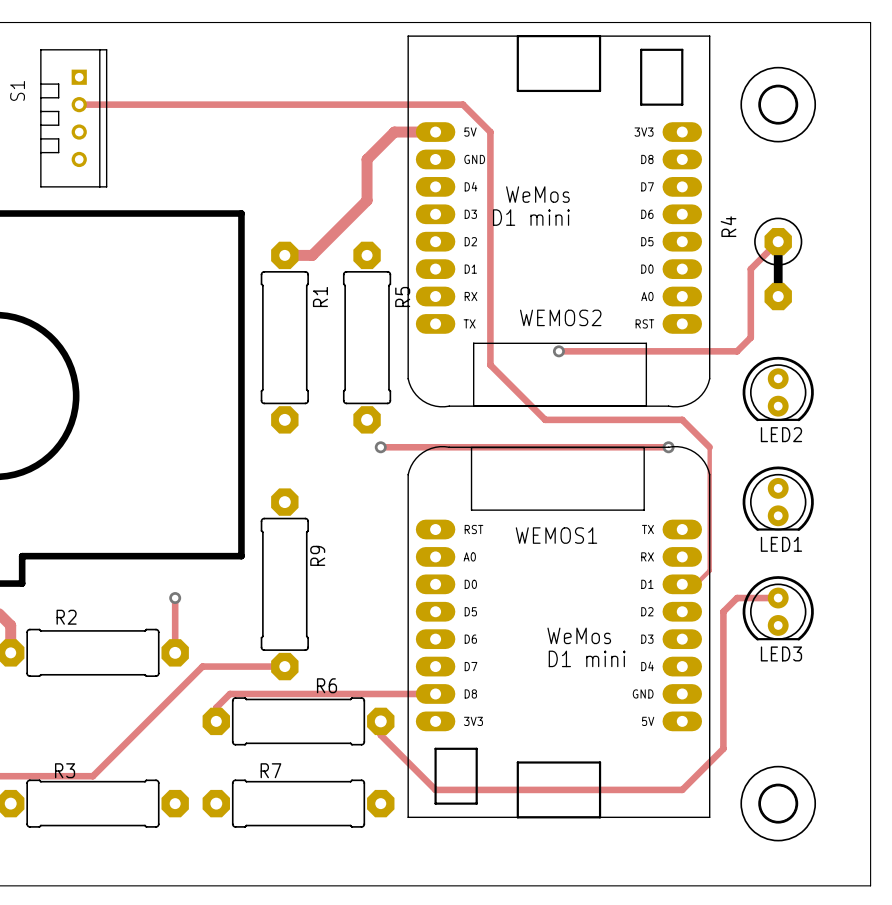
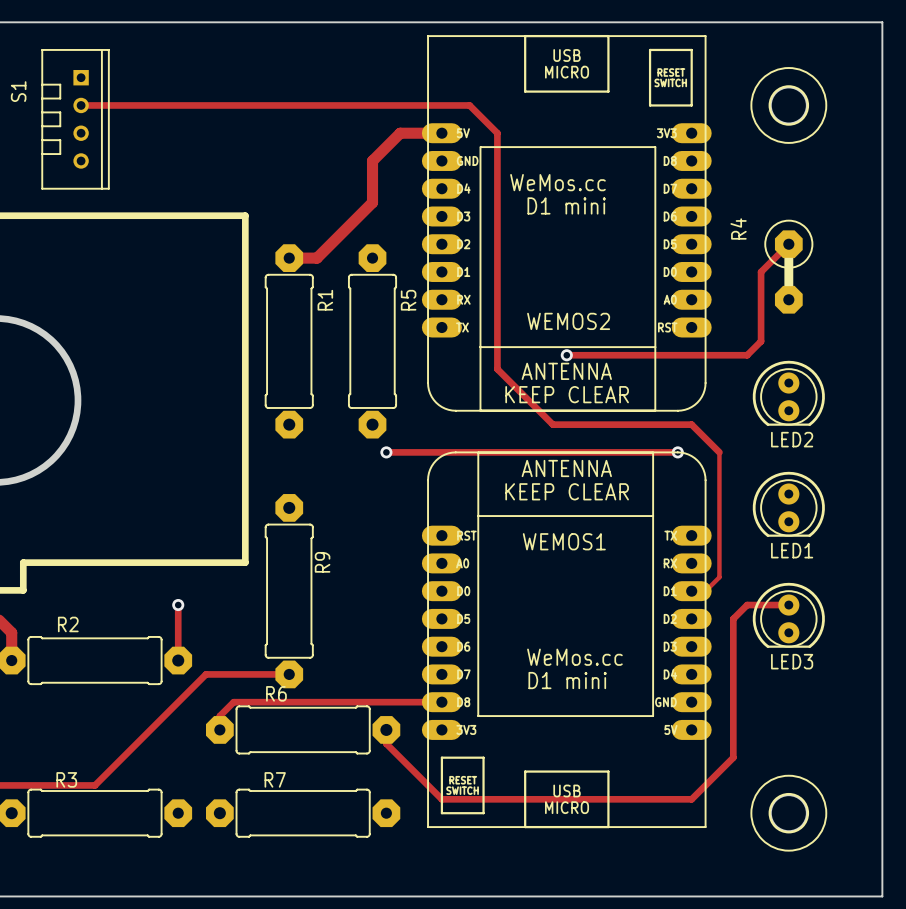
WEMOS2 footprint: [407, 35, 711, 408] -> [421, 34, 712, 412]
WEMOS1 footprint: [407, 445, 711, 819] -> [421, 451, 712, 829]
R6 name position: R6 (327, 685) -> R6 (276, 693)

